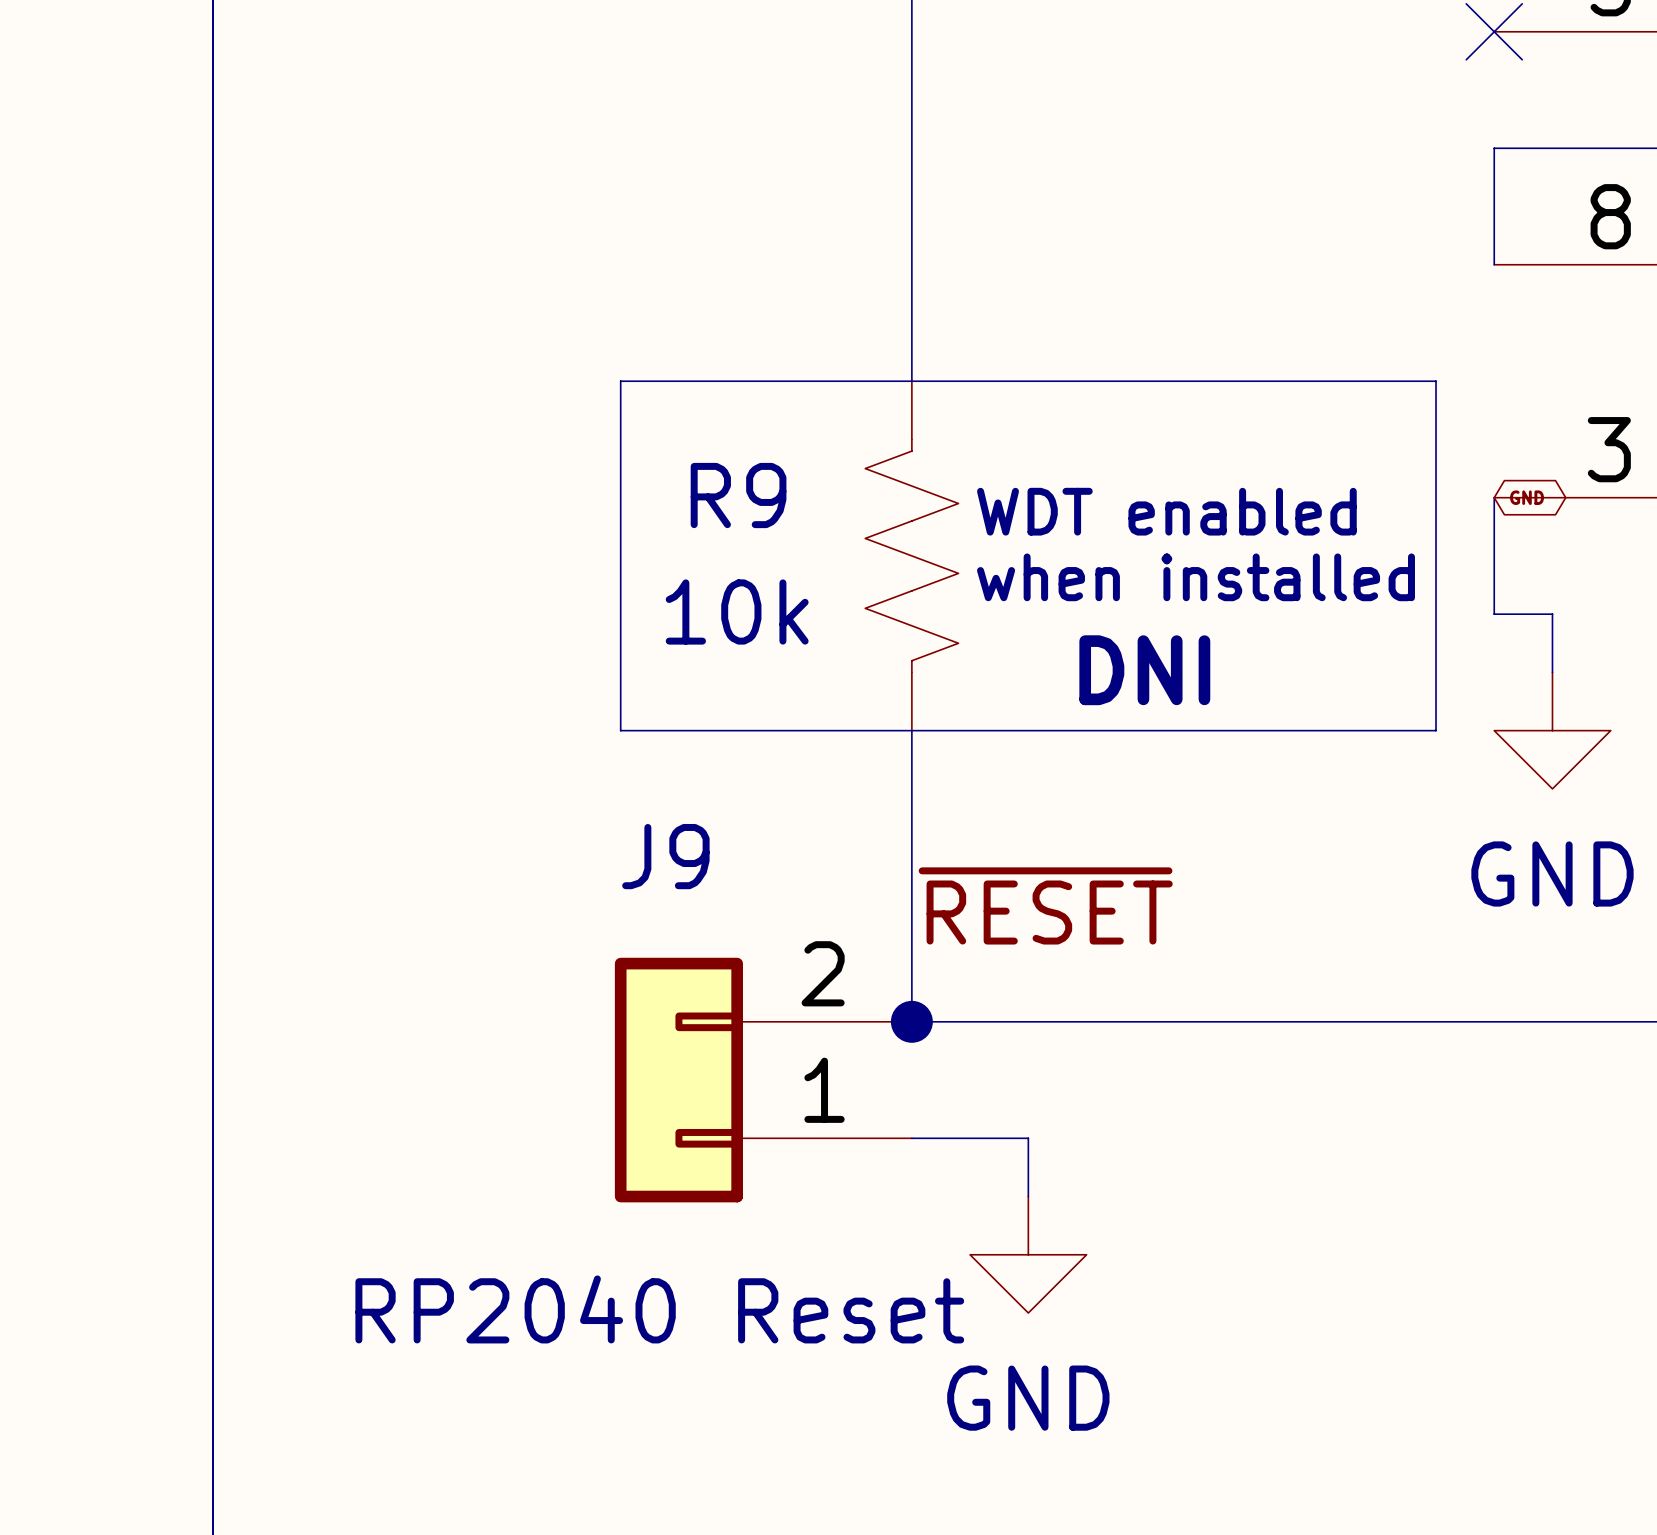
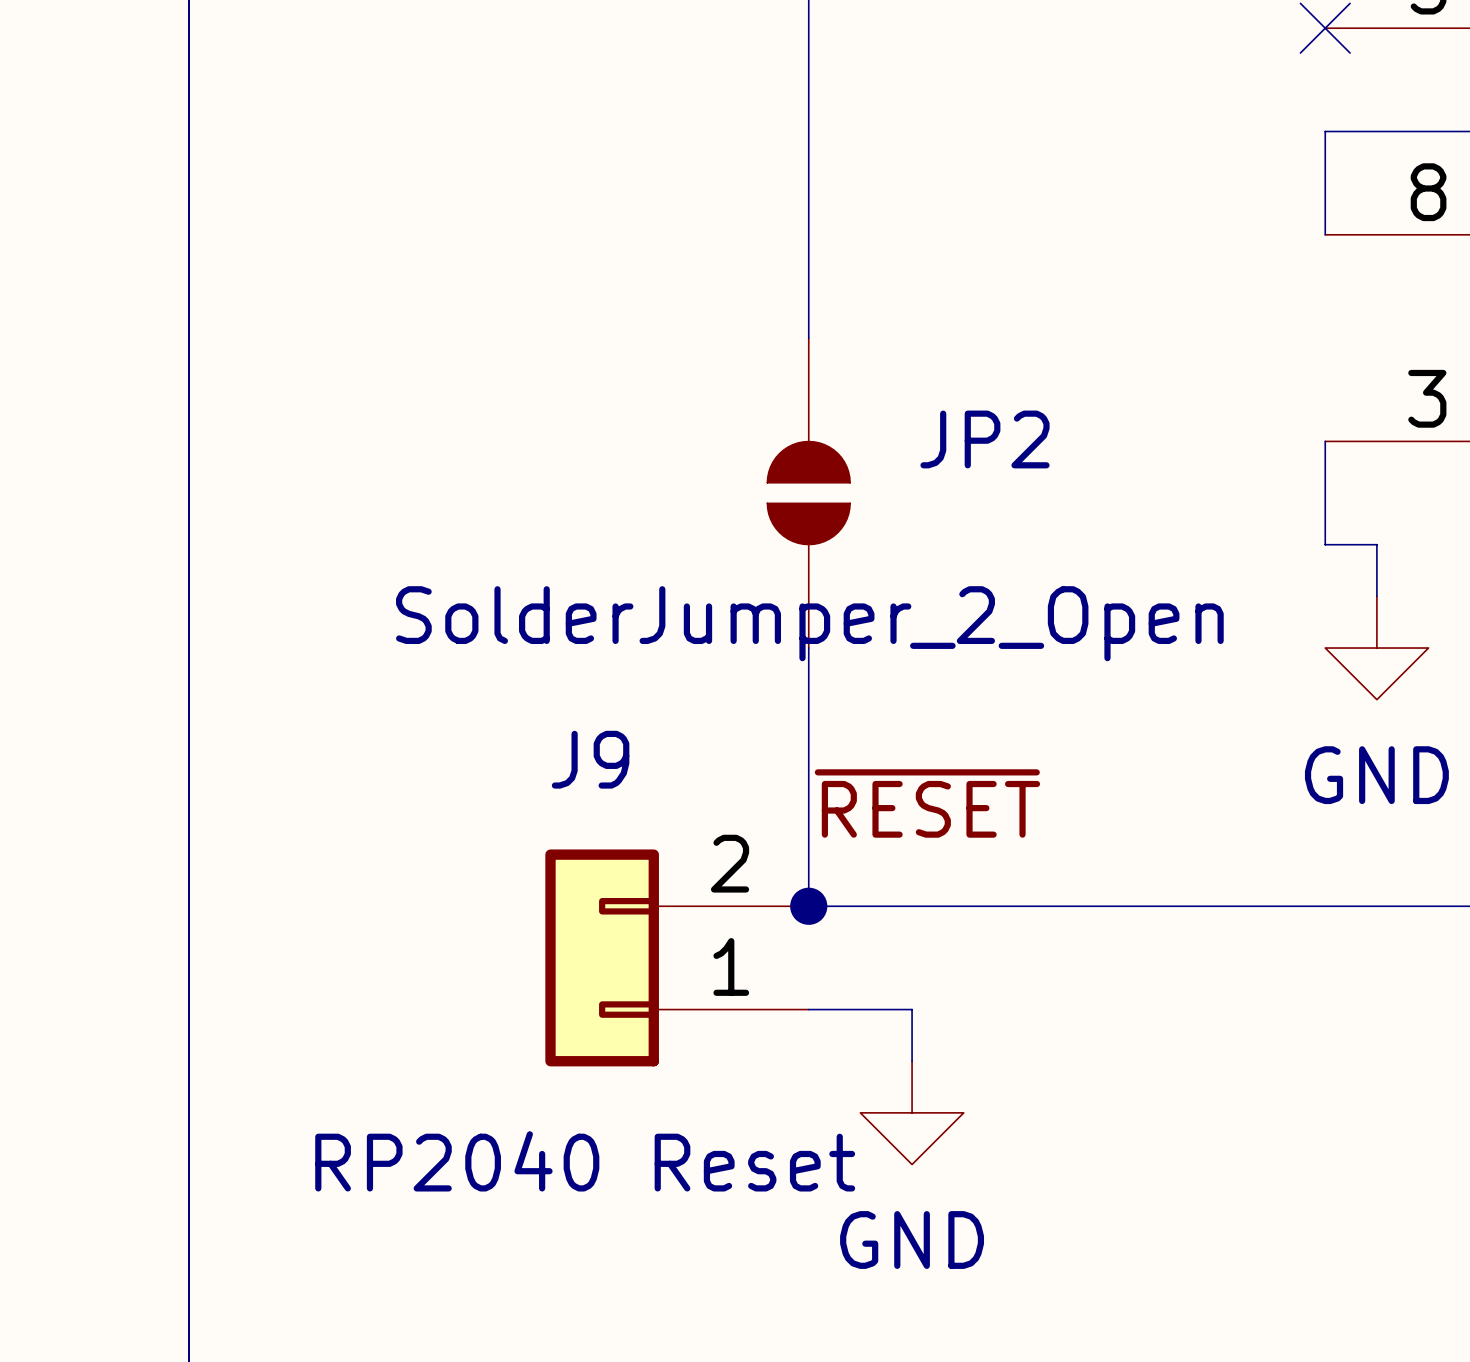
line: (620, 381) (1436, 381) (1436, 730) (620, 730) (620, 381) -> none
global label: GND (1527, 497) -> none
text: WDT enabled (1166, 511) -> none
R9: 10k (911, 555) -> none
JP2: none -> SolderJumper_2_Open (808, 493)
text: when installed (1196, 577) -> none

